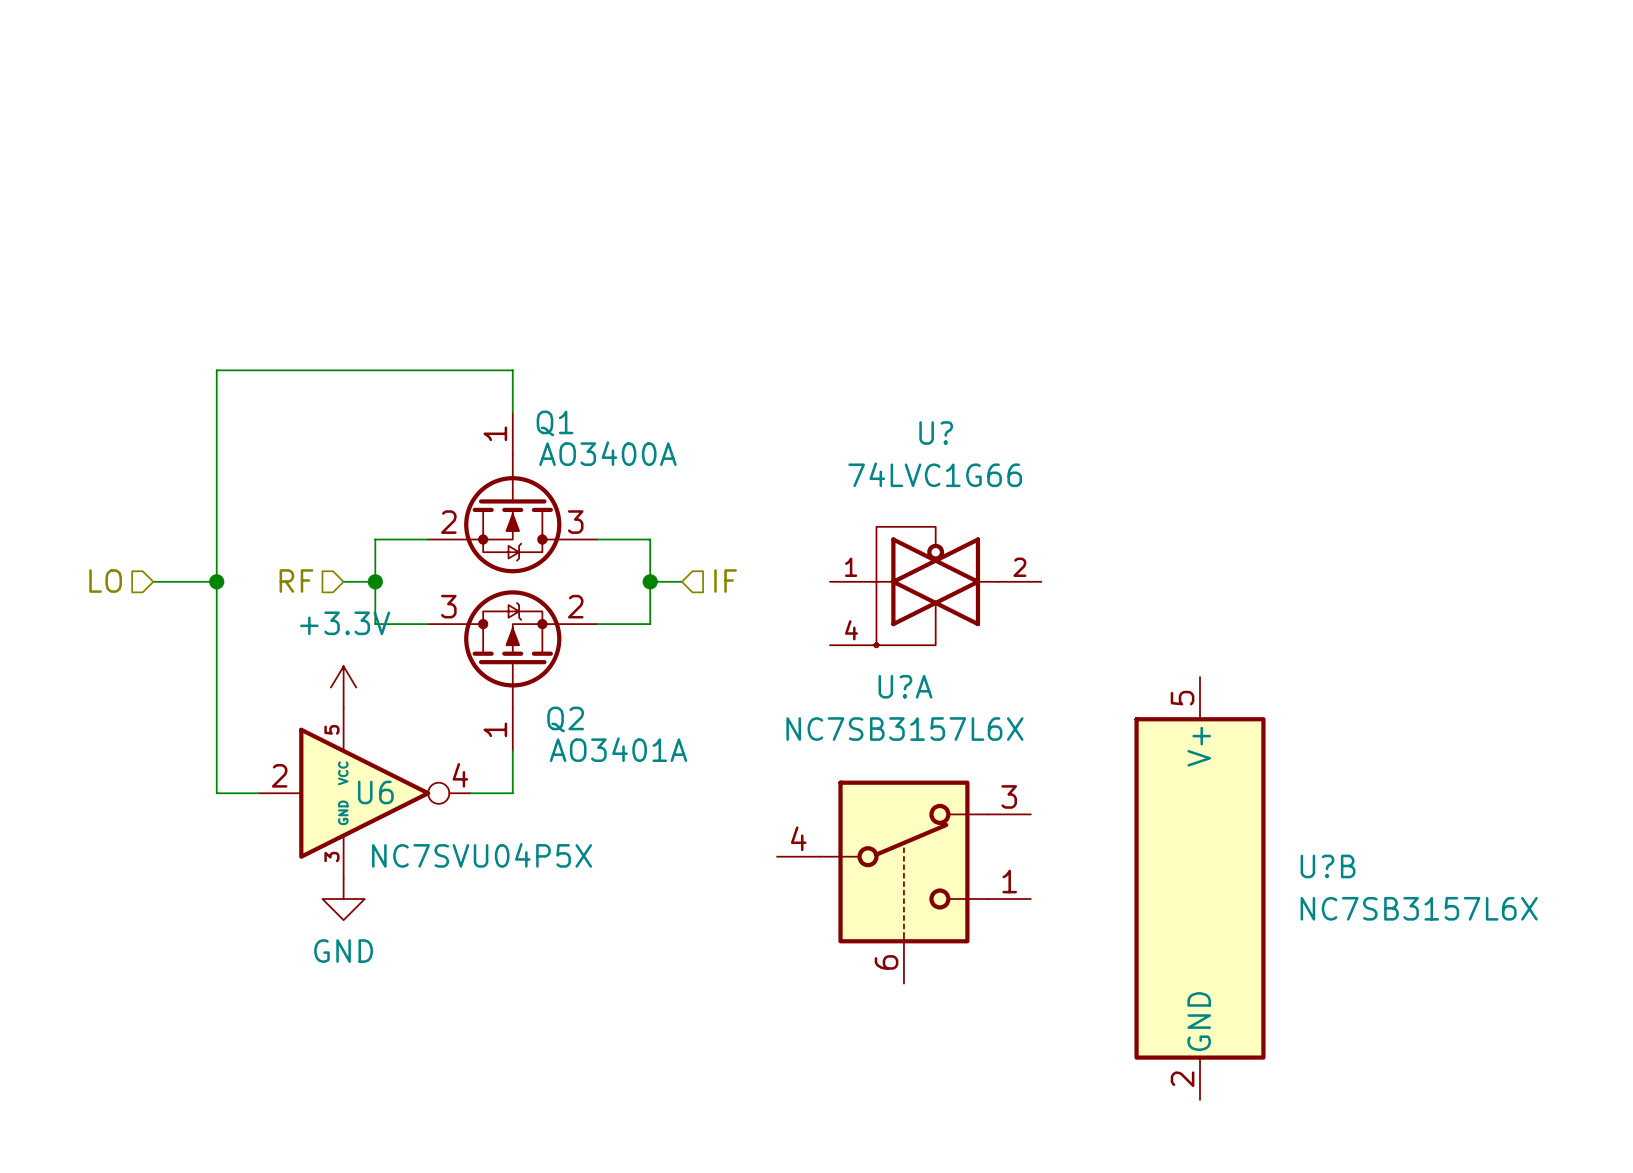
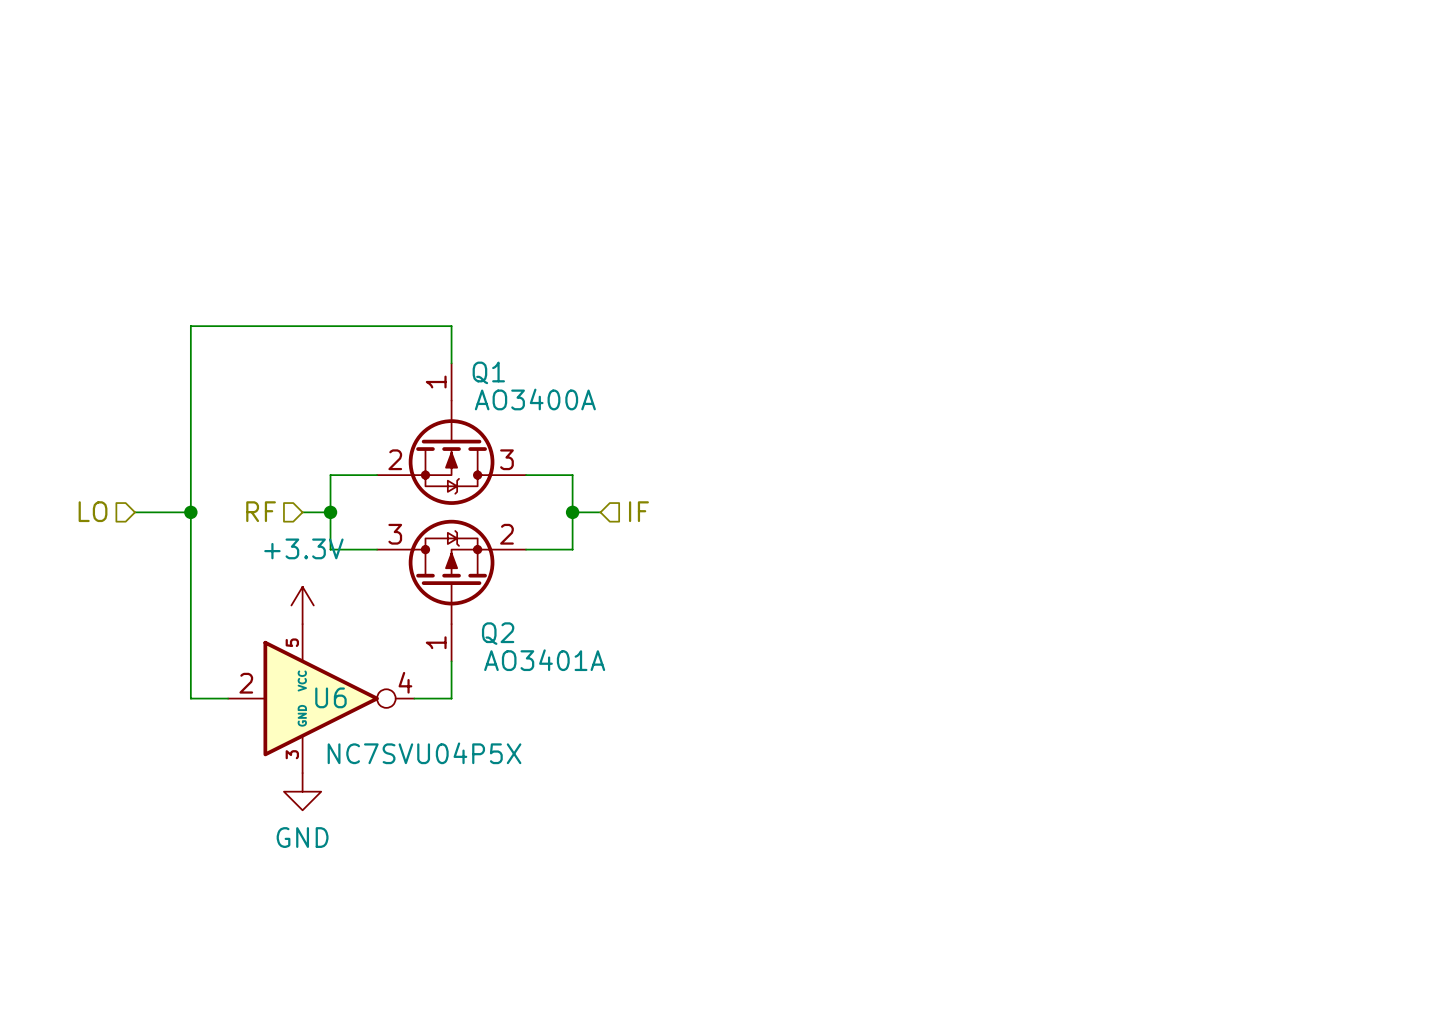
U?: 74LVC1G66 (935, 587) -> none
U?A: NC7SB3157L6X (903, 882) -> none
U?B: NC7SB3157L6X (1200, 888) -> none

